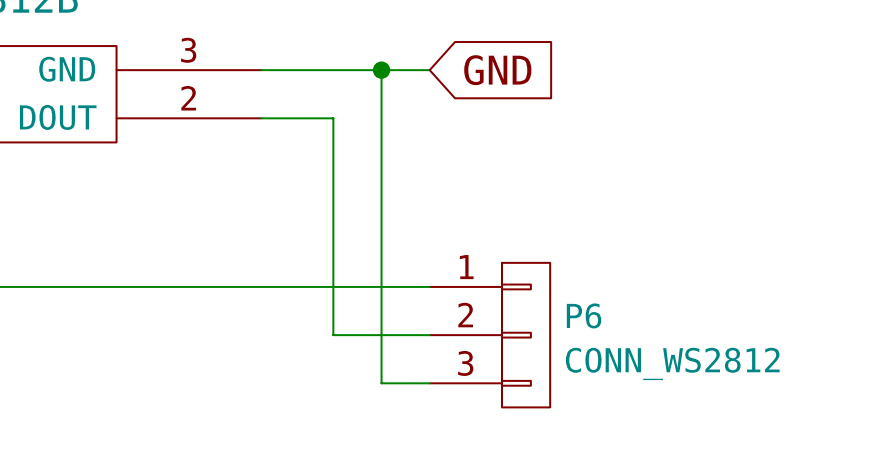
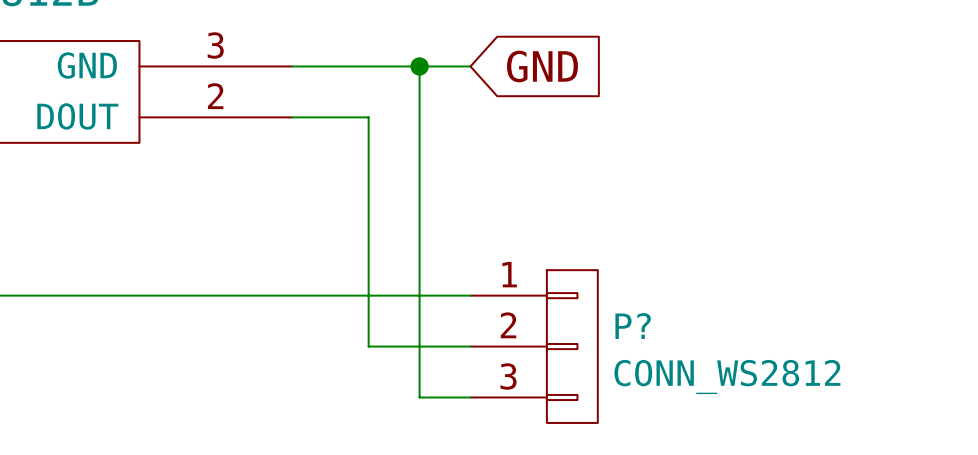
P6 name: P6 (584, 315) -> P? (633, 326)

